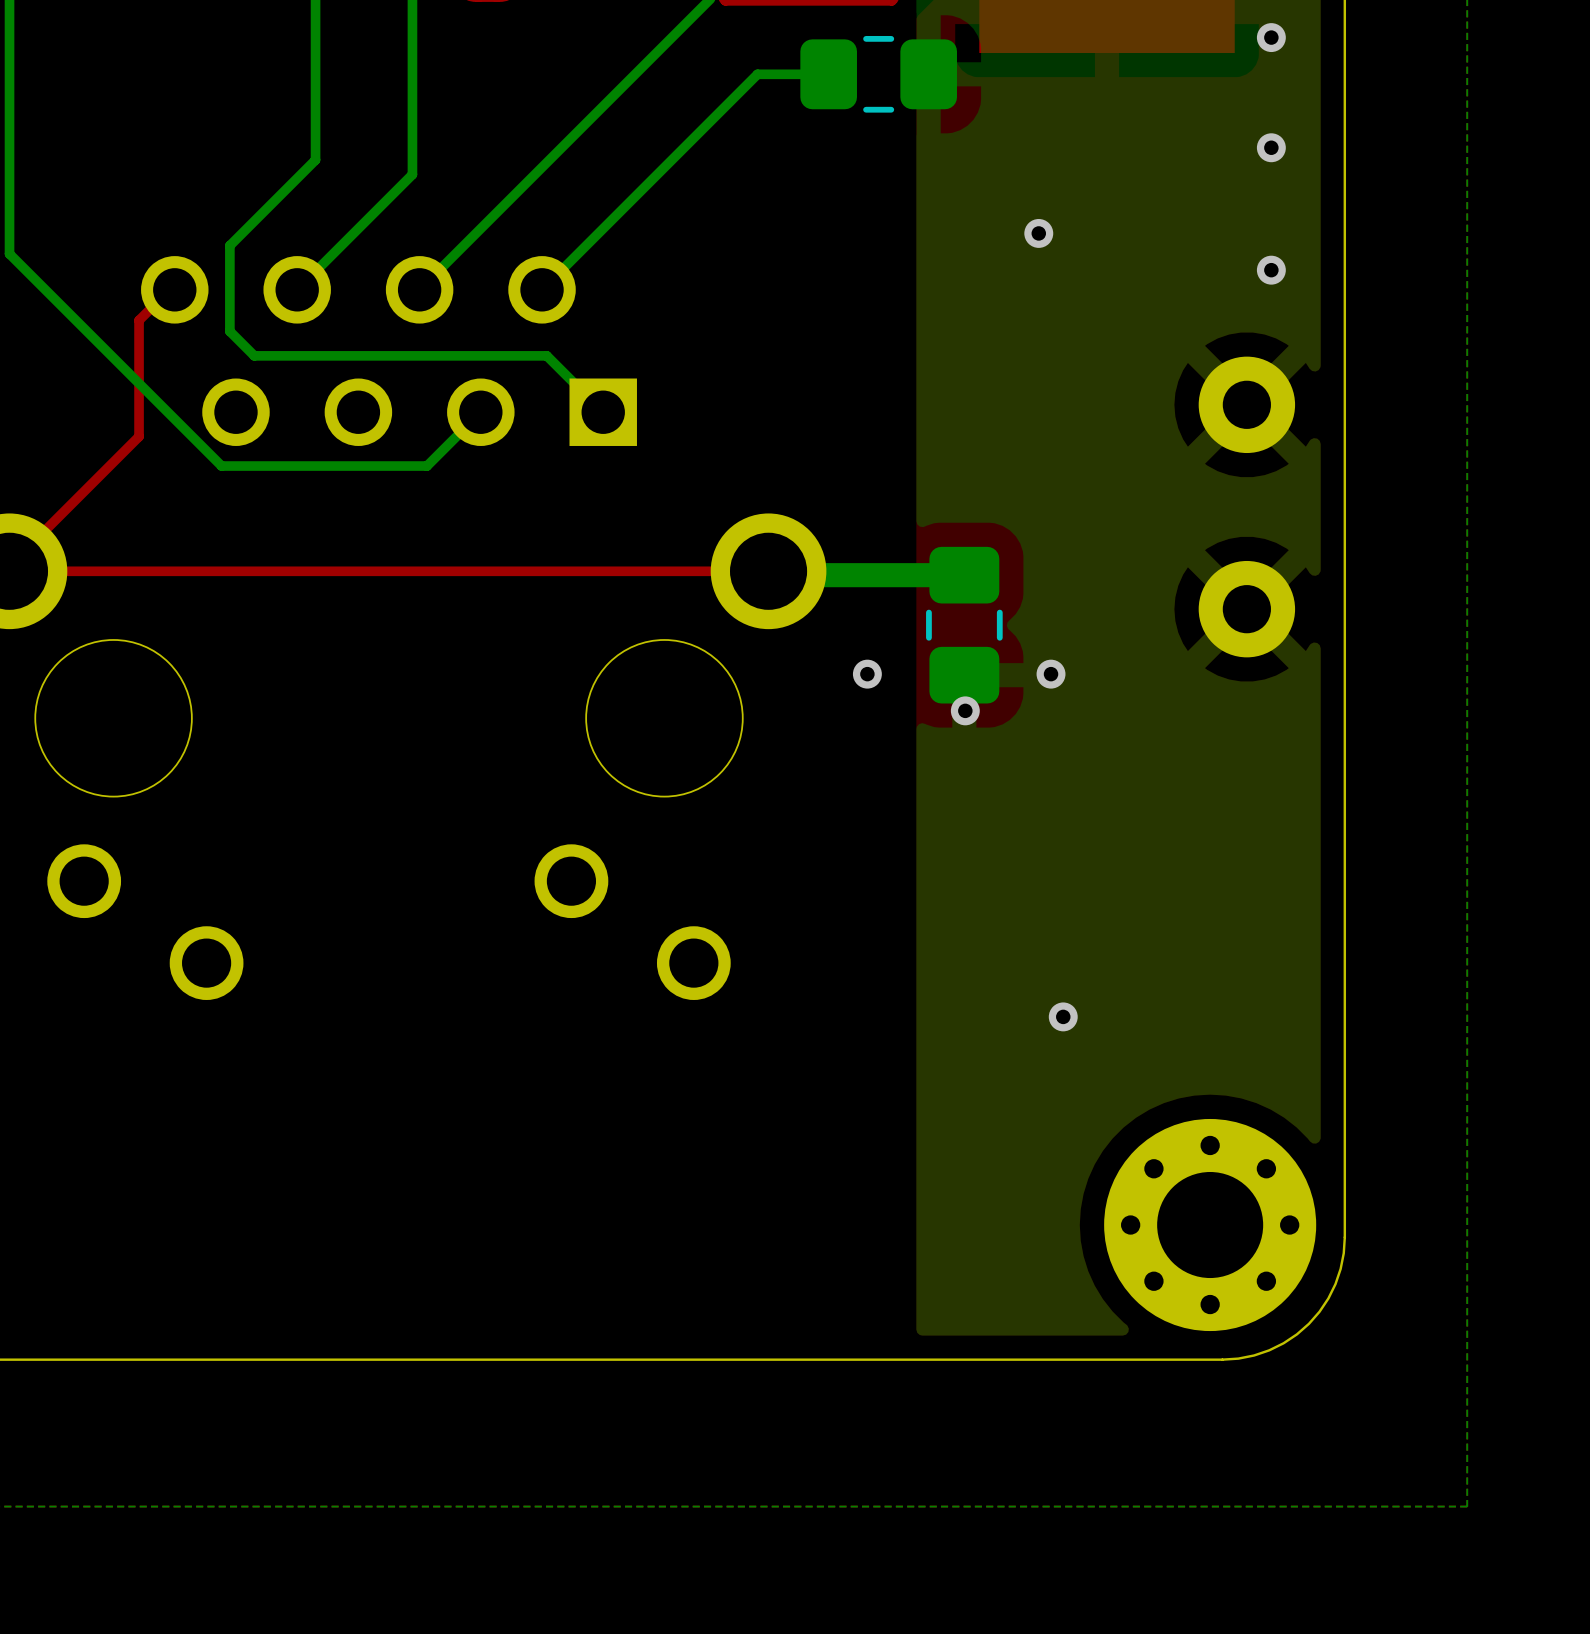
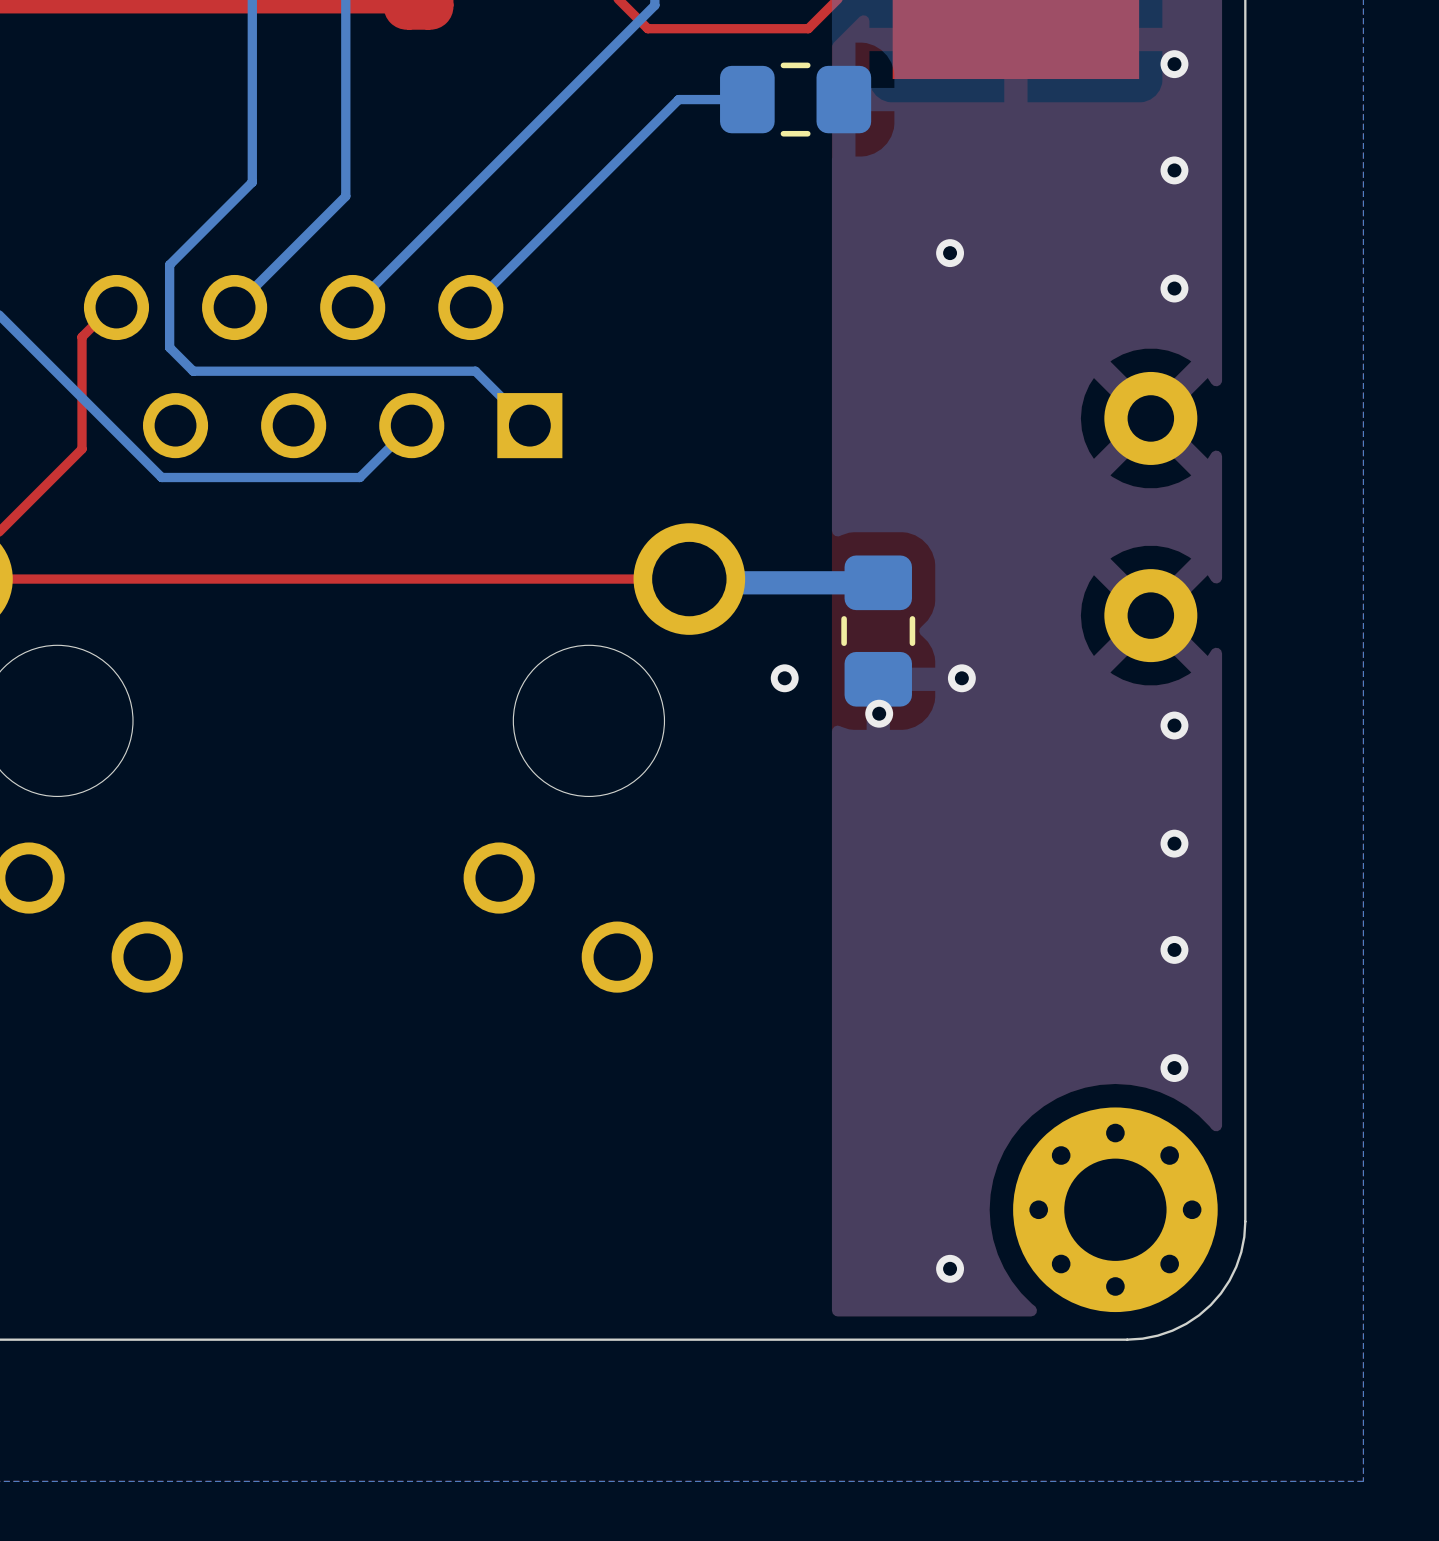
via: none -> (1174, 725)
via: none -> (1174, 843)
via: none -> (1174, 949)
via: (1063, 1016) -> none
via: none -> (1174, 1068)
via: none -> (950, 1268)

